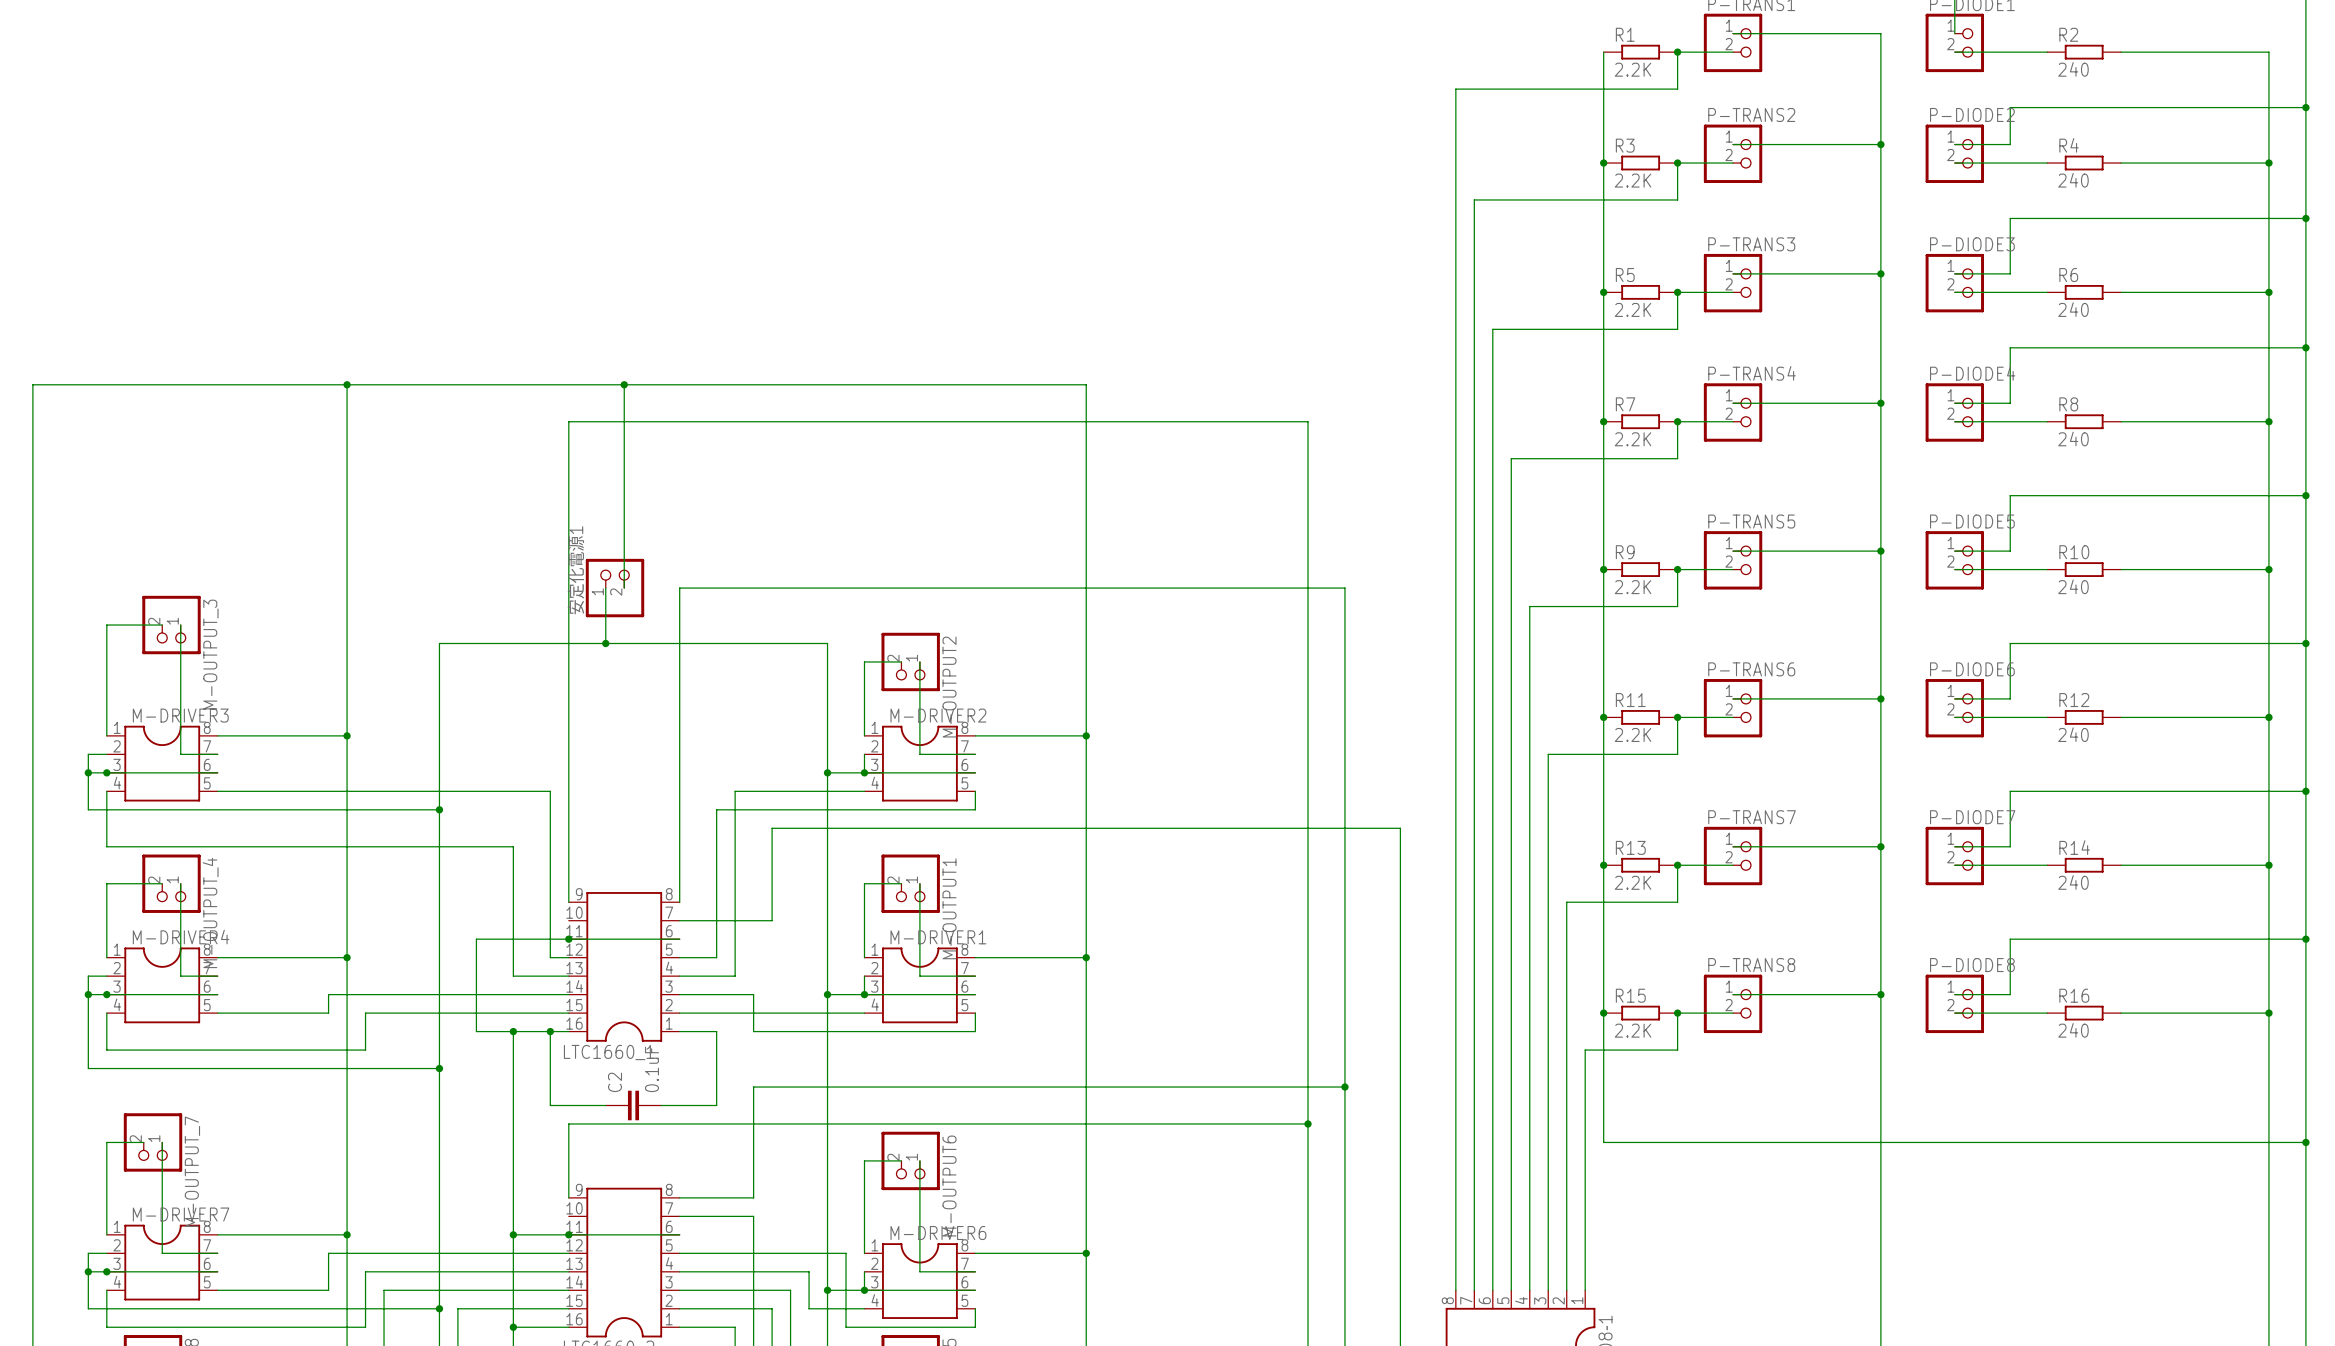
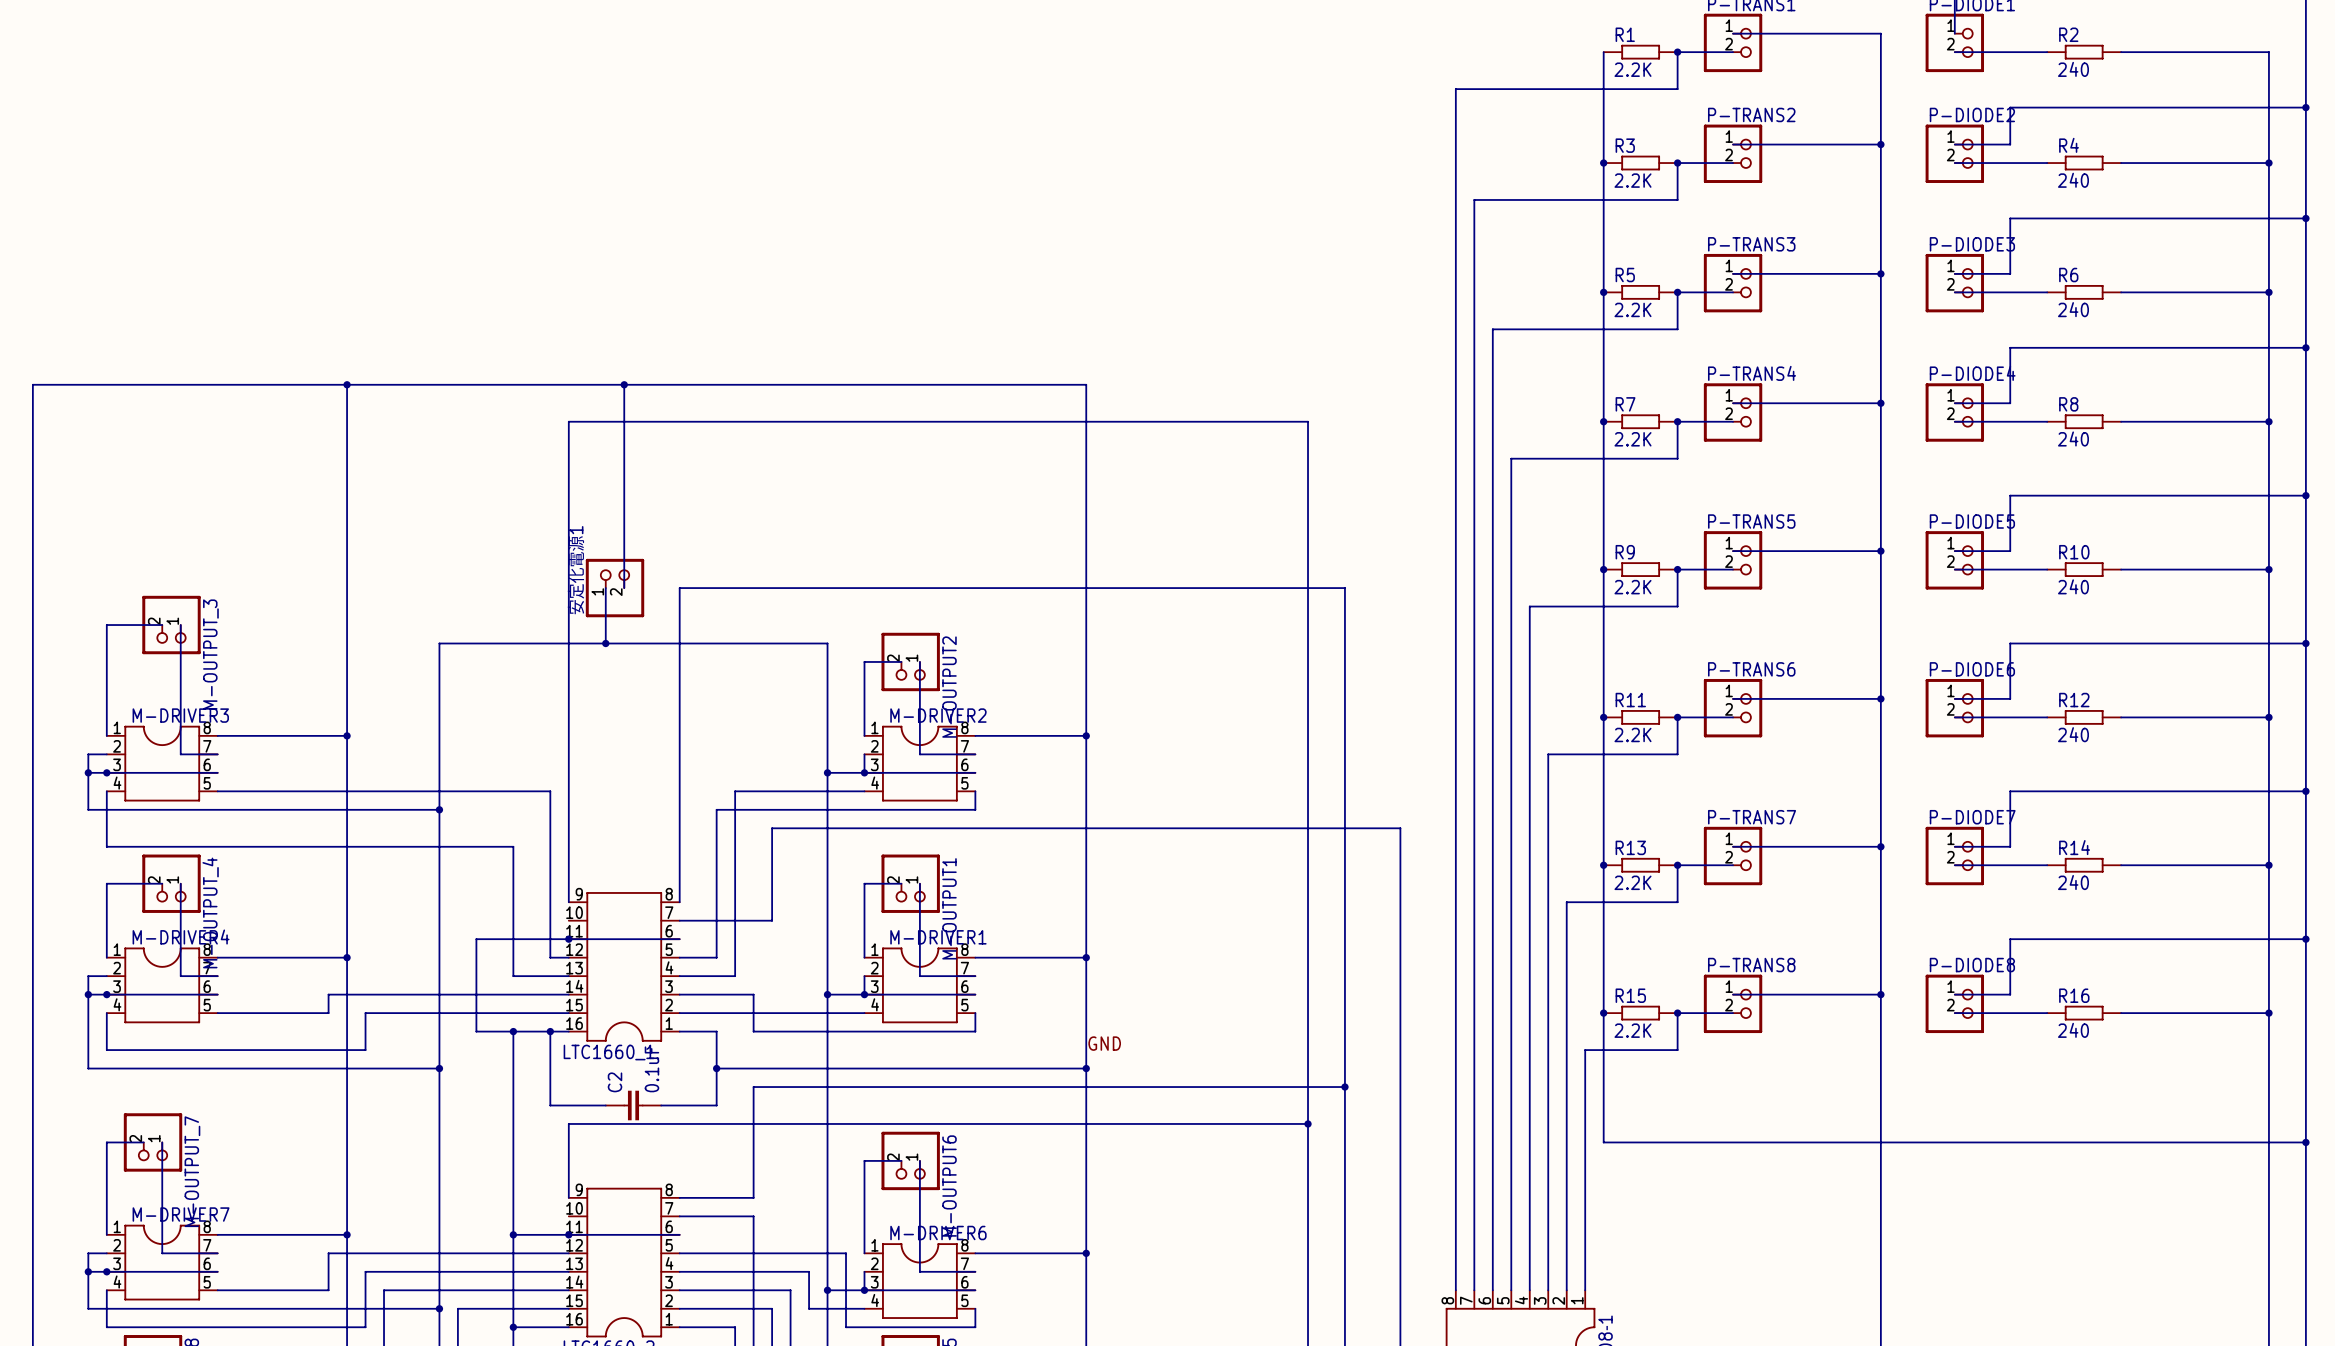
label: none -> GND (1104, 1043)
wire: none -> (716, 1068) (1086, 1068)
junction: none -> (716, 1068)
junction: none -> (1086, 1068)

